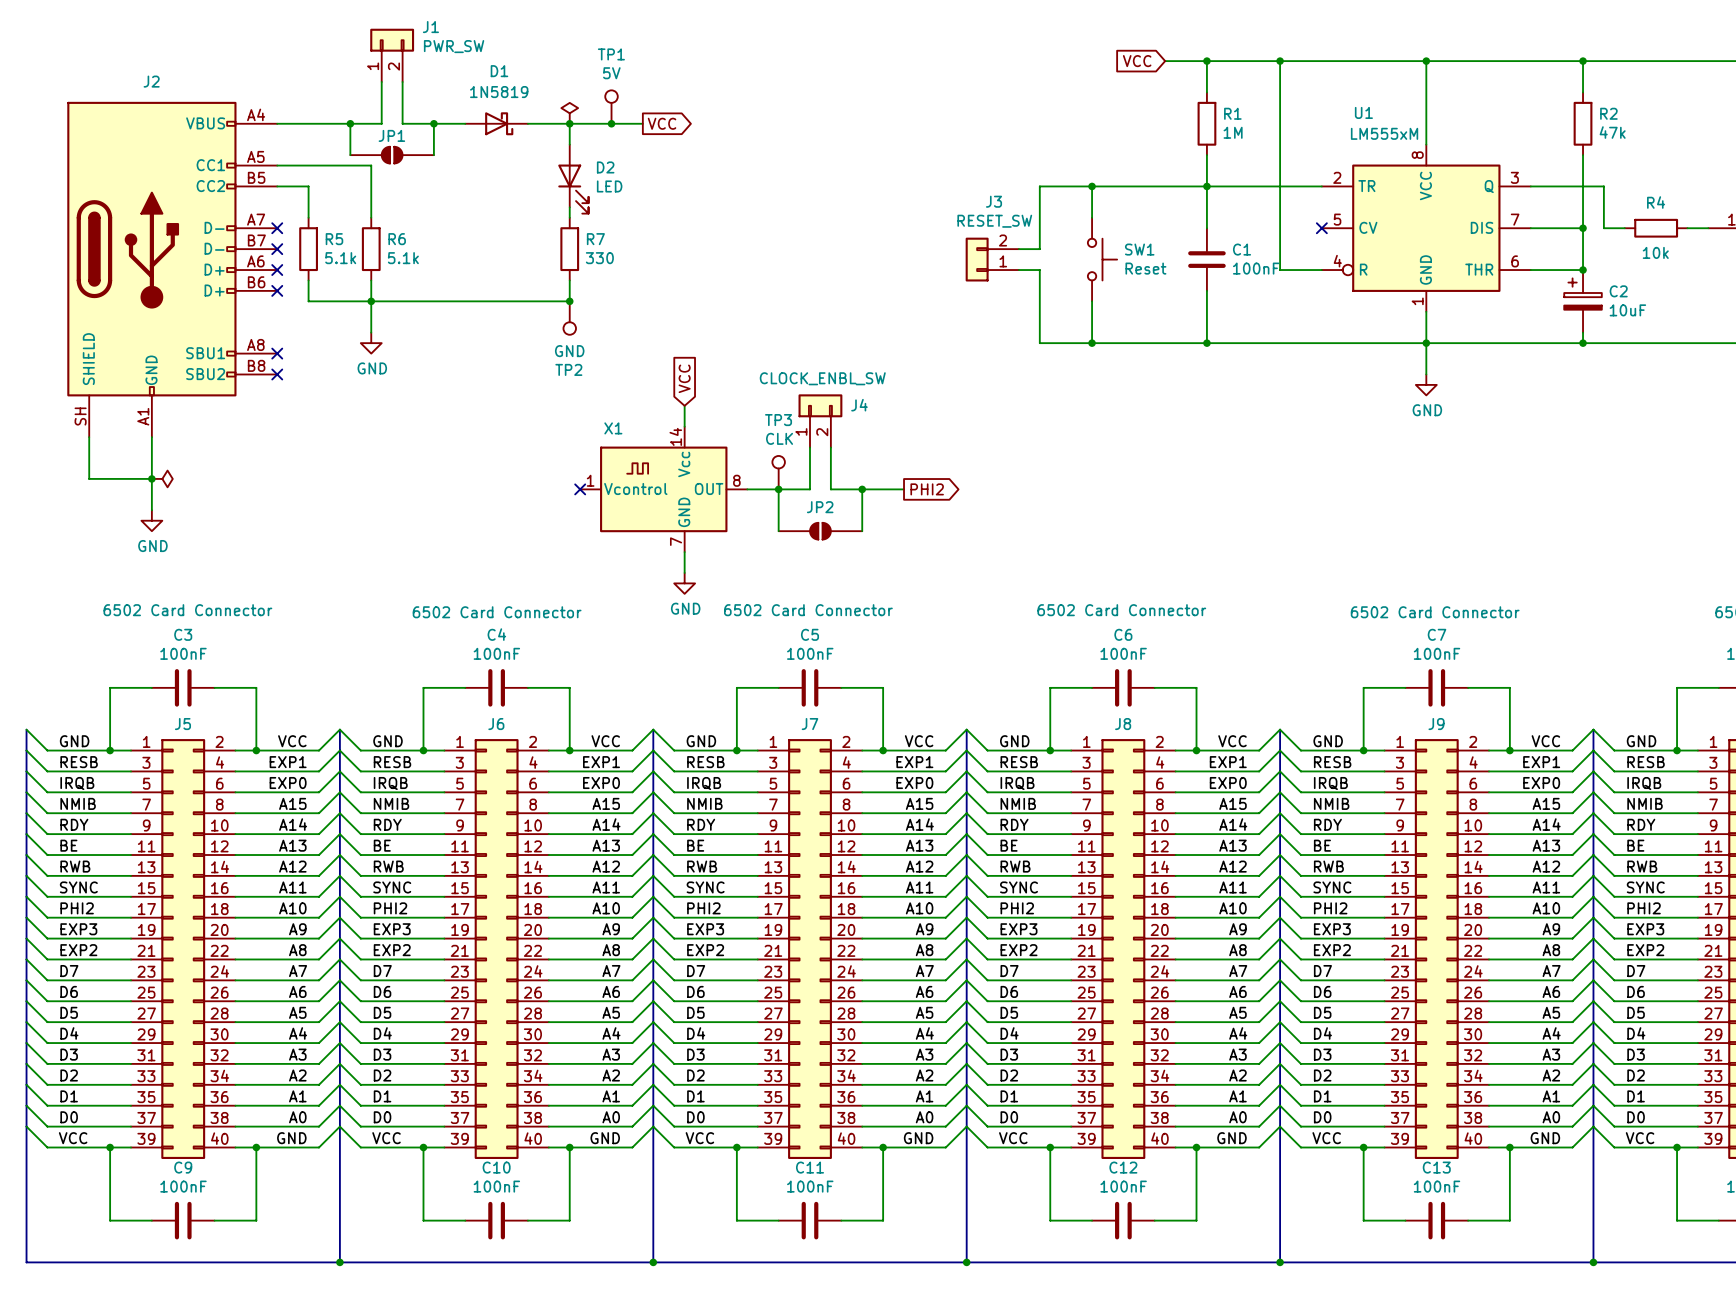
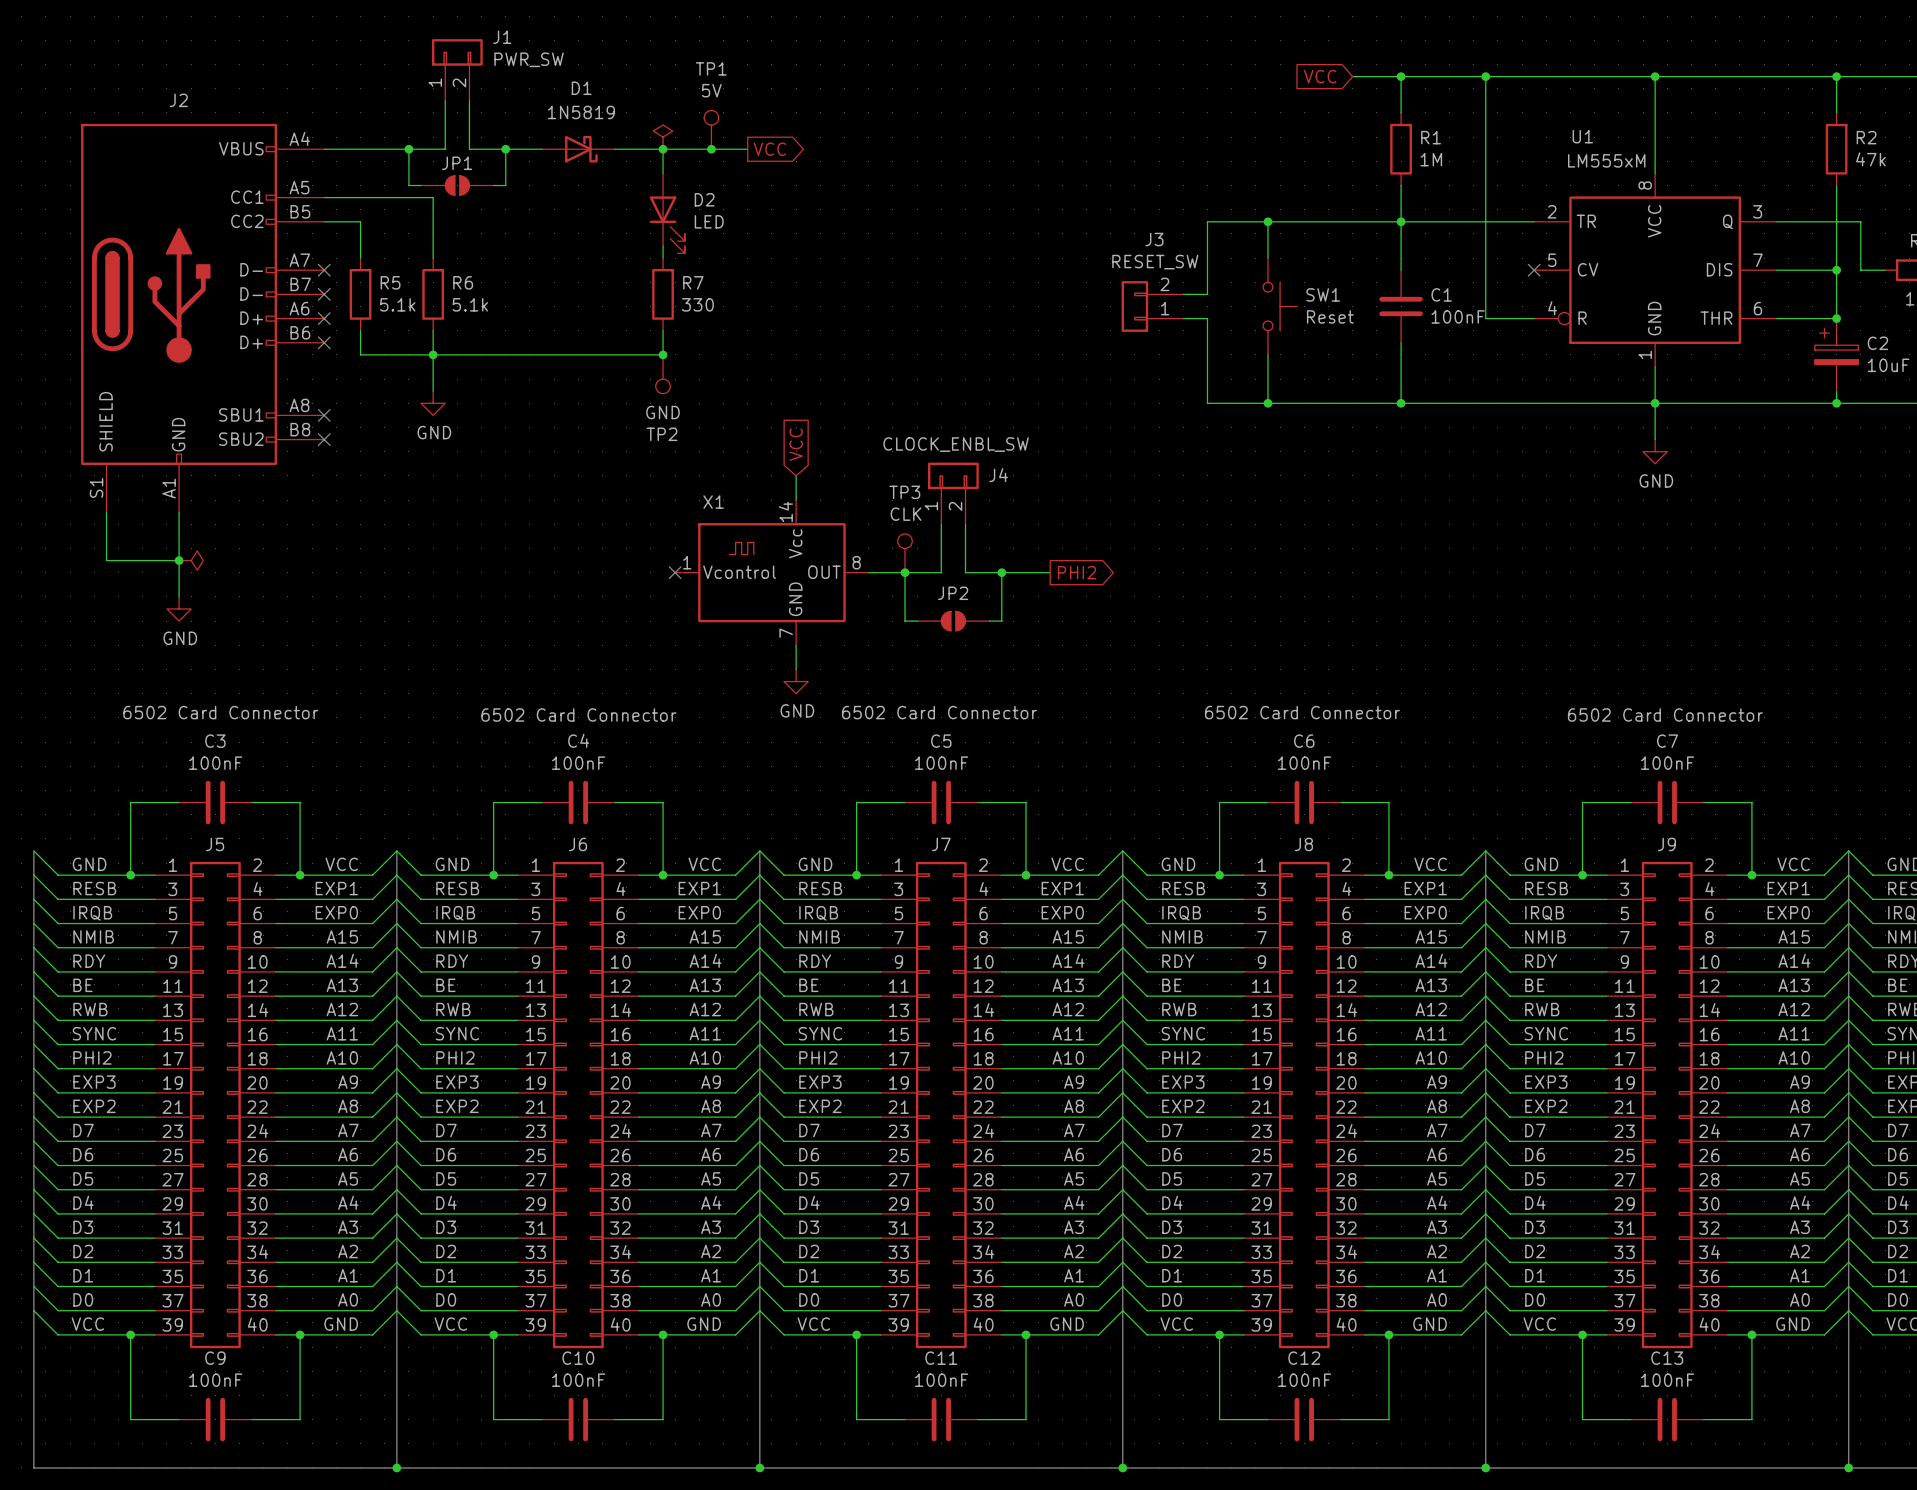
JP1 symbol: [350, 146, 434, 165] -> [421, 175, 494, 196]
J2 pin number: SH (80, 416) -> S1 (96, 487)
JP2 symbol: [778, 522, 863, 541] -> [917, 611, 990, 631]

